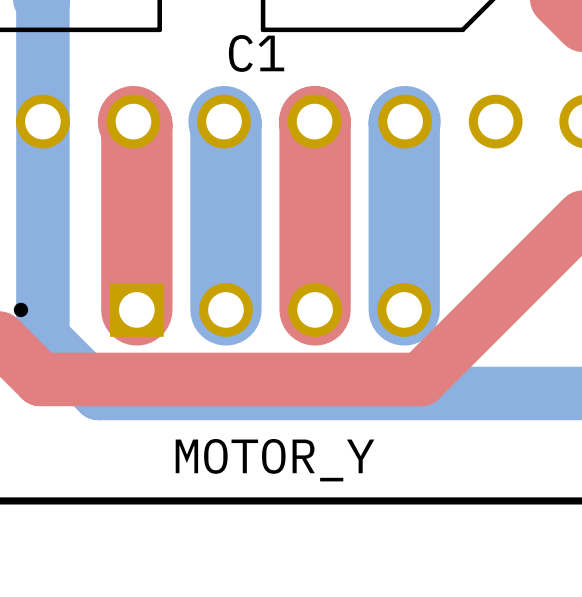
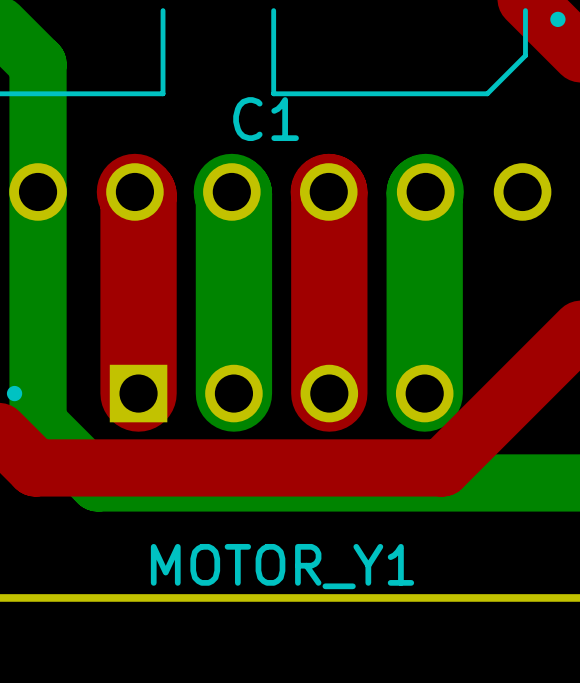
MOTOR_Y name: MOTOR_Y (275, 460) -> MOTOR_Y1 (282, 566)

